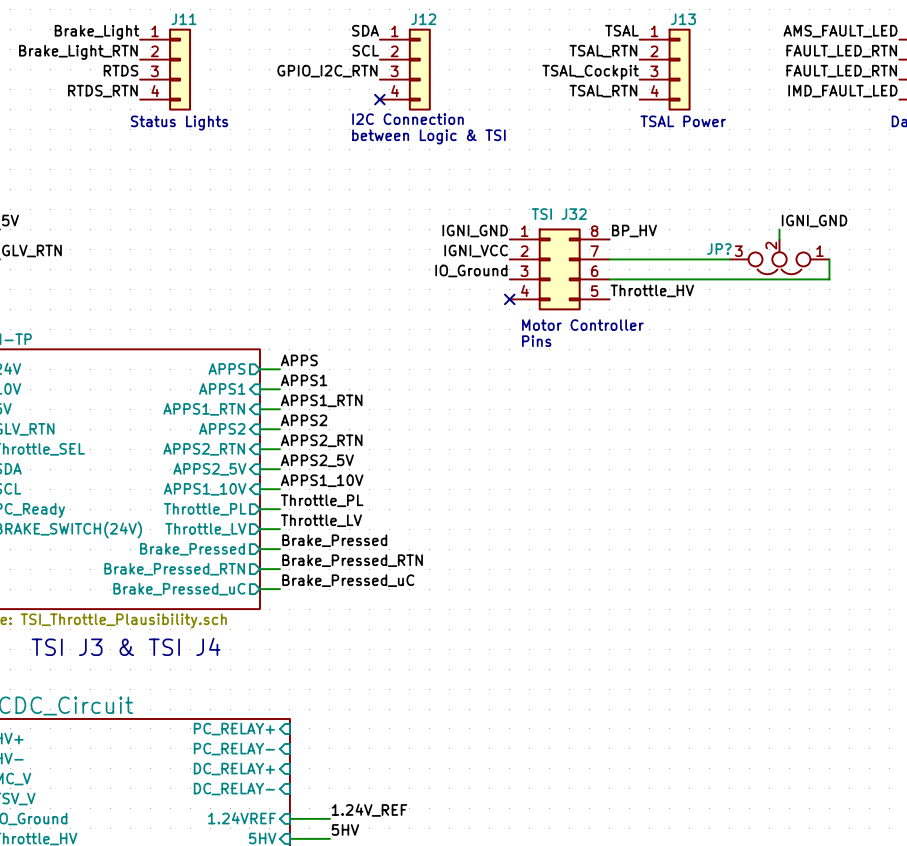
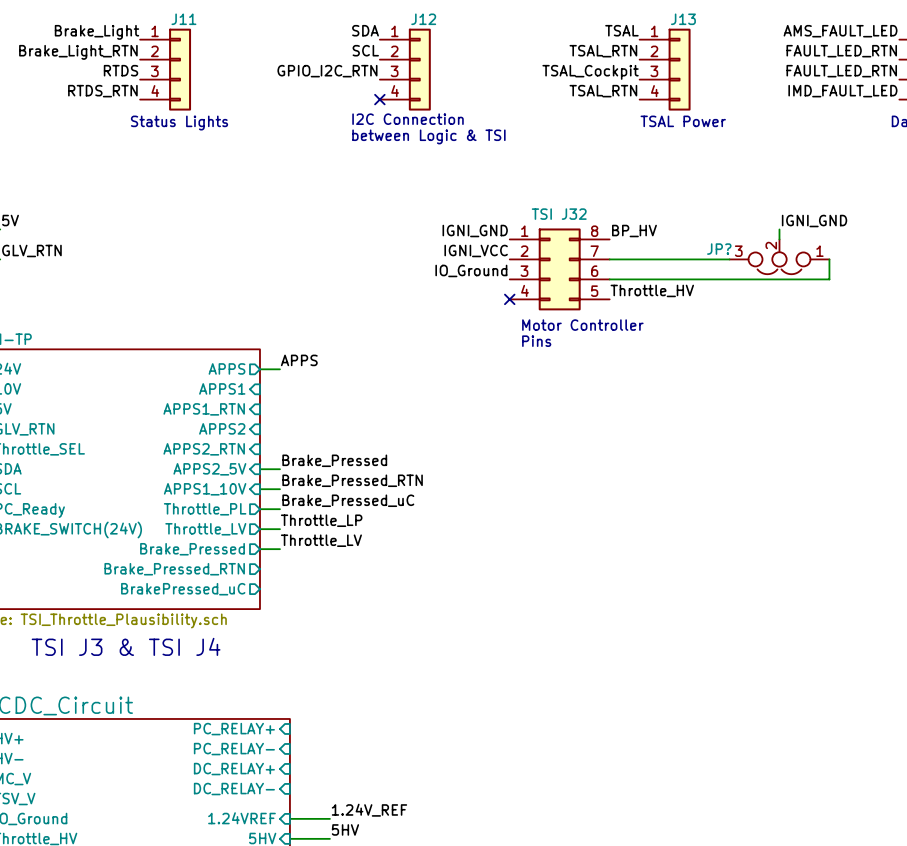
label: APPS1 (304, 380) -> none
wire: (259, 389) (279, 389) -> none
label: APPS1_RTN (321, 400) -> none
wire: (259, 409) (279, 409) -> none
label: APPS2 (304, 420) -> none
wire: (259, 429) (279, 429) -> none
label: APPS2_RTN (321, 440) -> none
wire: (259, 449) (279, 449) -> none
label: APPS2_5V (317, 460) -> Brake_Pressed (334, 460)
label: APPS1_10V (322, 480) -> Brake_Pressed_RTN (352, 480)
label: Throttle_PL (322, 500) -> Brake_Pressed_uC (348, 500)
label: Throttle_LV (321, 520) -> Throttle_LP (321, 520)
label: Brake_Pressed (334, 540) -> Throttle_LV (321, 540)
label: Brake_Pressed_RTN (352, 560) -> none
wire: (259, 569) (279, 569) -> none
label: Brake_Pressed_uC (348, 580) -> none
sheet pin: Brake_Pressed_uC (179, 589) -> BrakePressed_uC (183, 589)
wire: (259, 589) (279, 589) -> none

